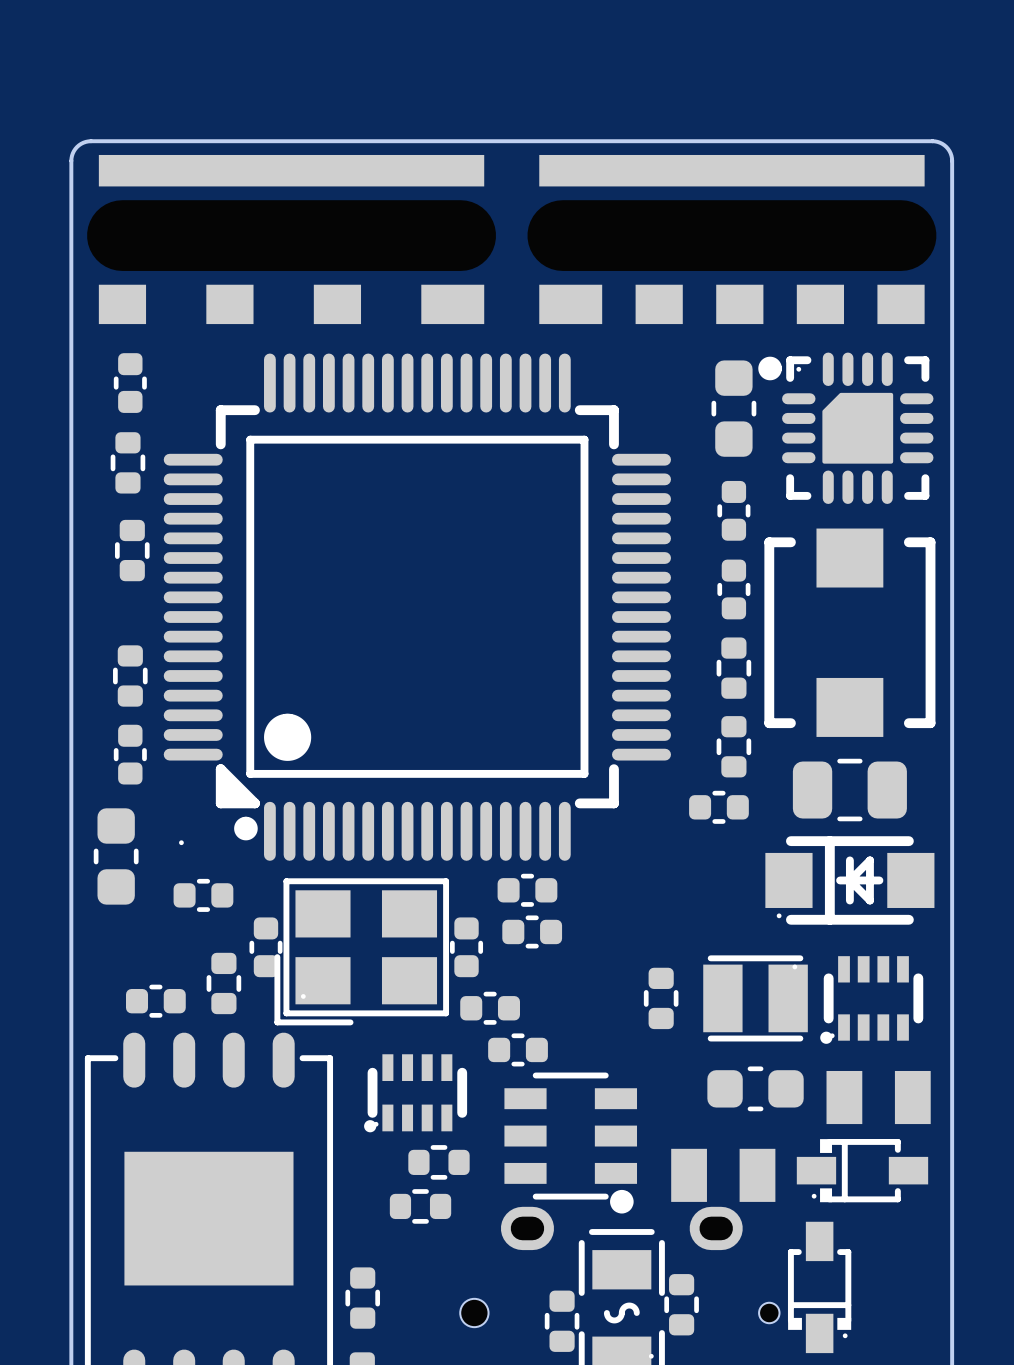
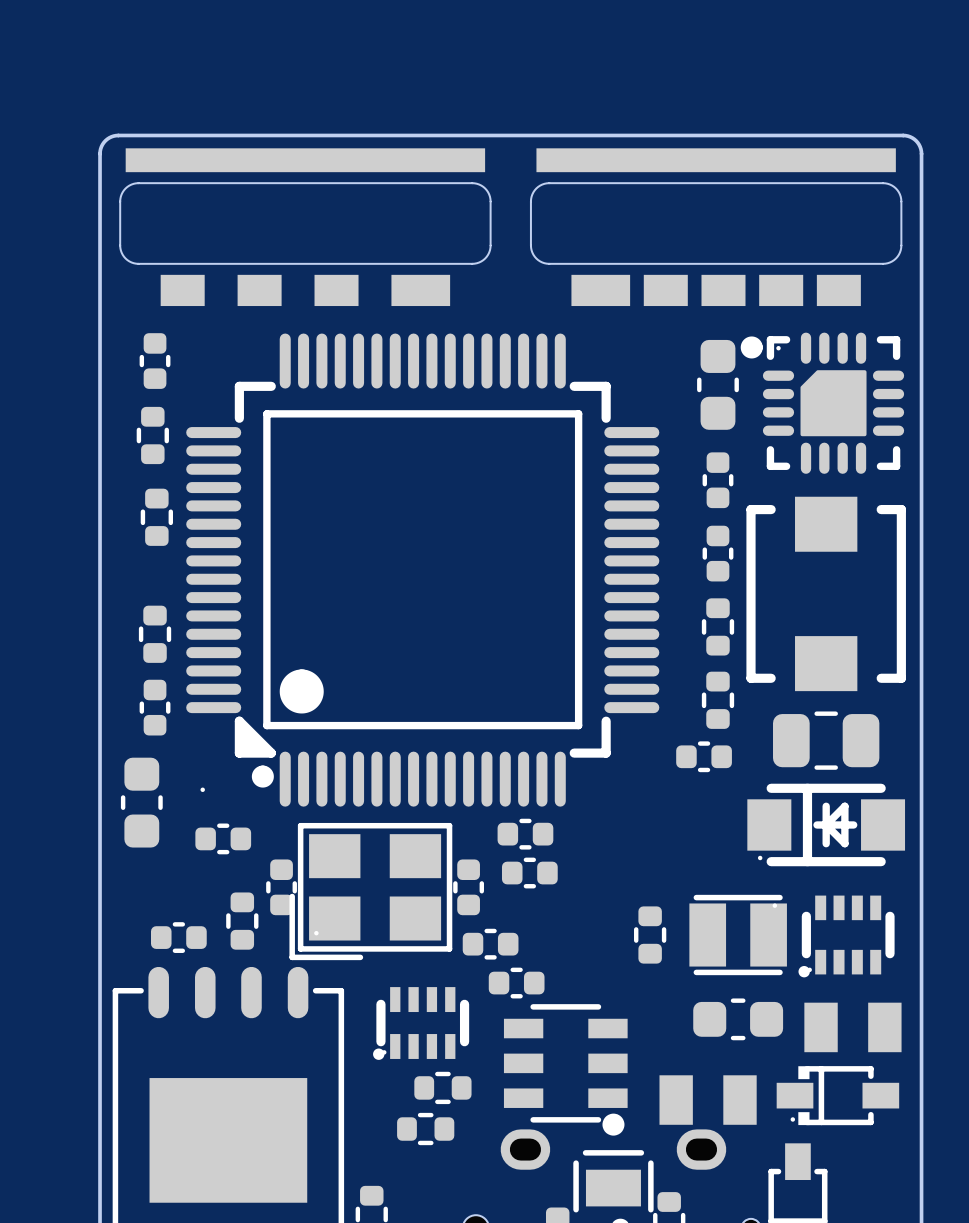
part footprint: [87, 154, 937, 325] -> [119, 148, 903, 307]

